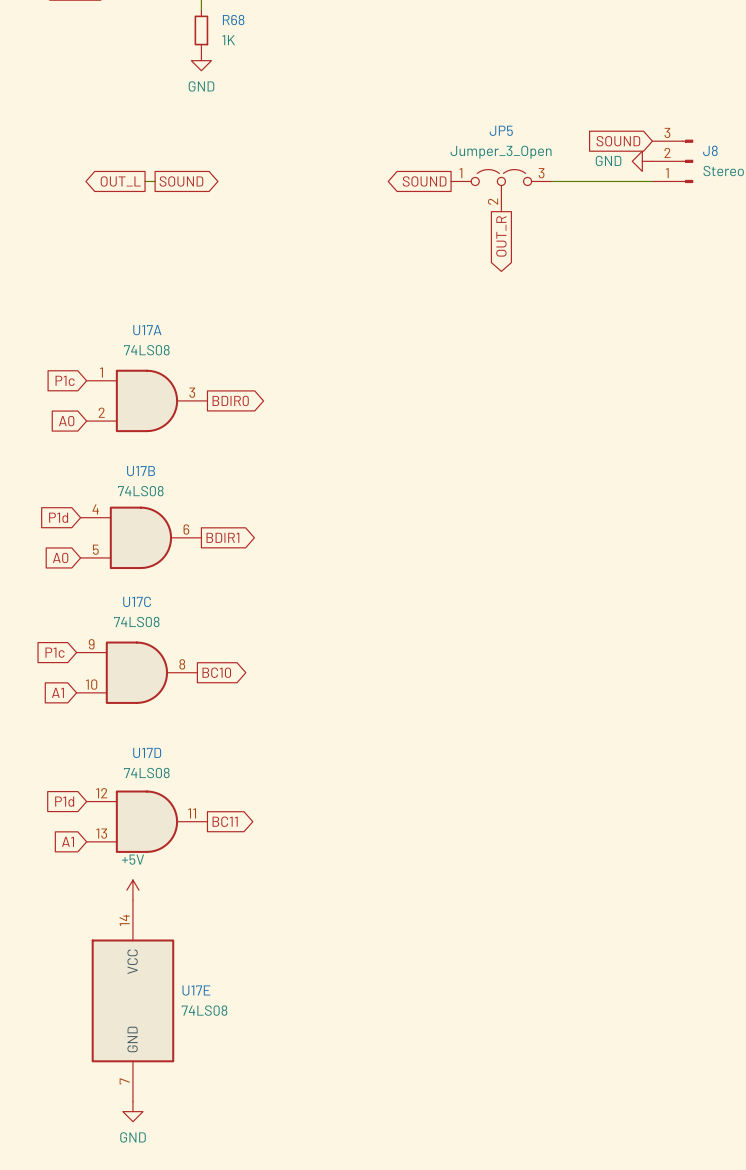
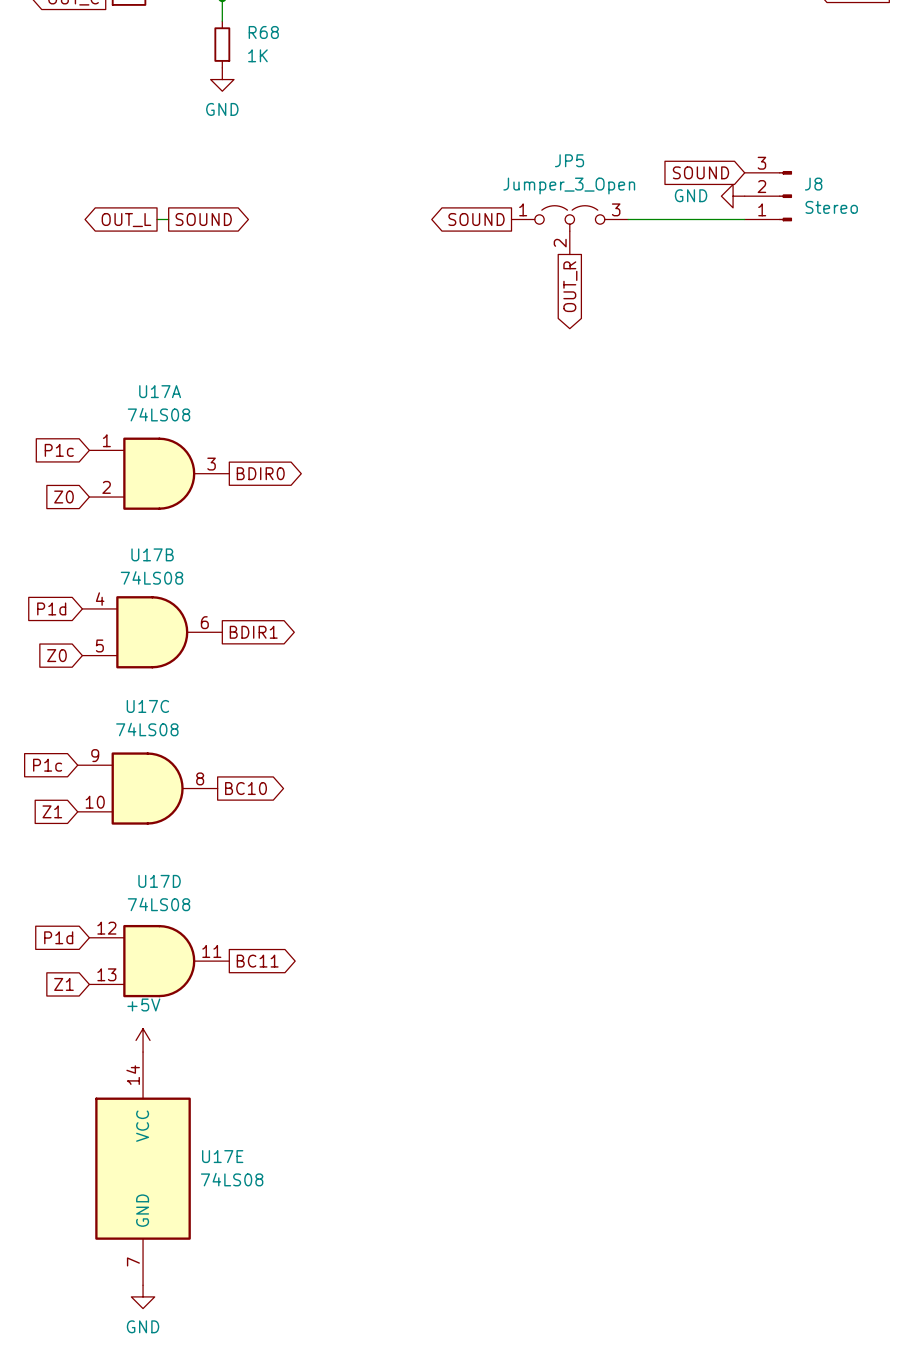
global label: A0 (66, 421) -> Z0 (63, 497)
global label: A0 (60, 557) -> Z0 (56, 655)
global label: A1 (57, 692) -> Z1 (52, 811)
global label: A1 (68, 841) -> Z1 (63, 984)

